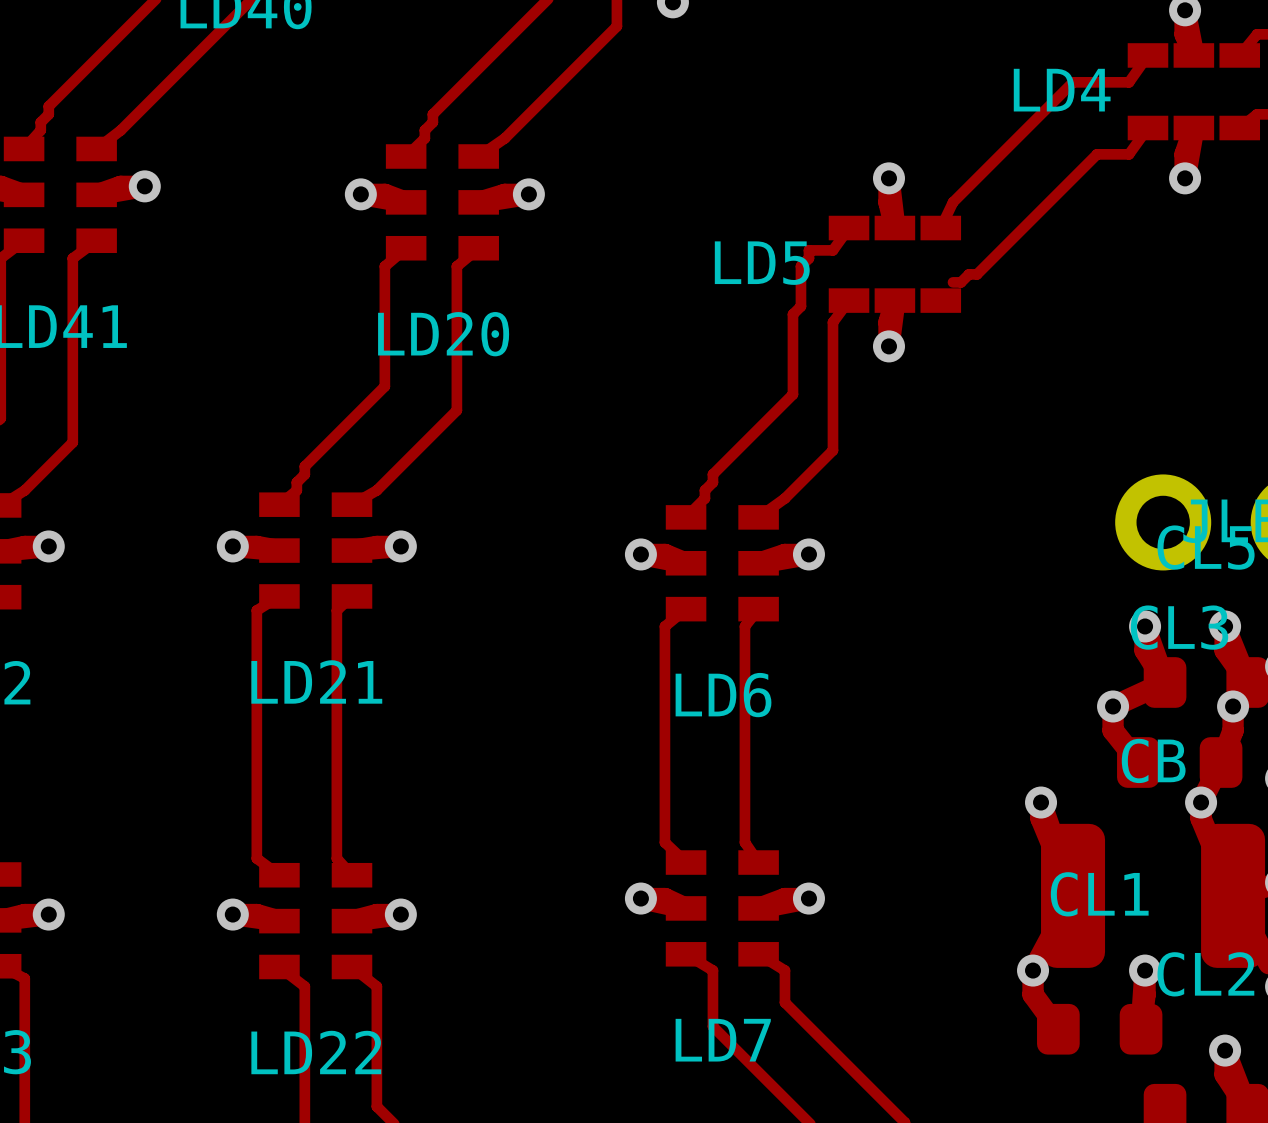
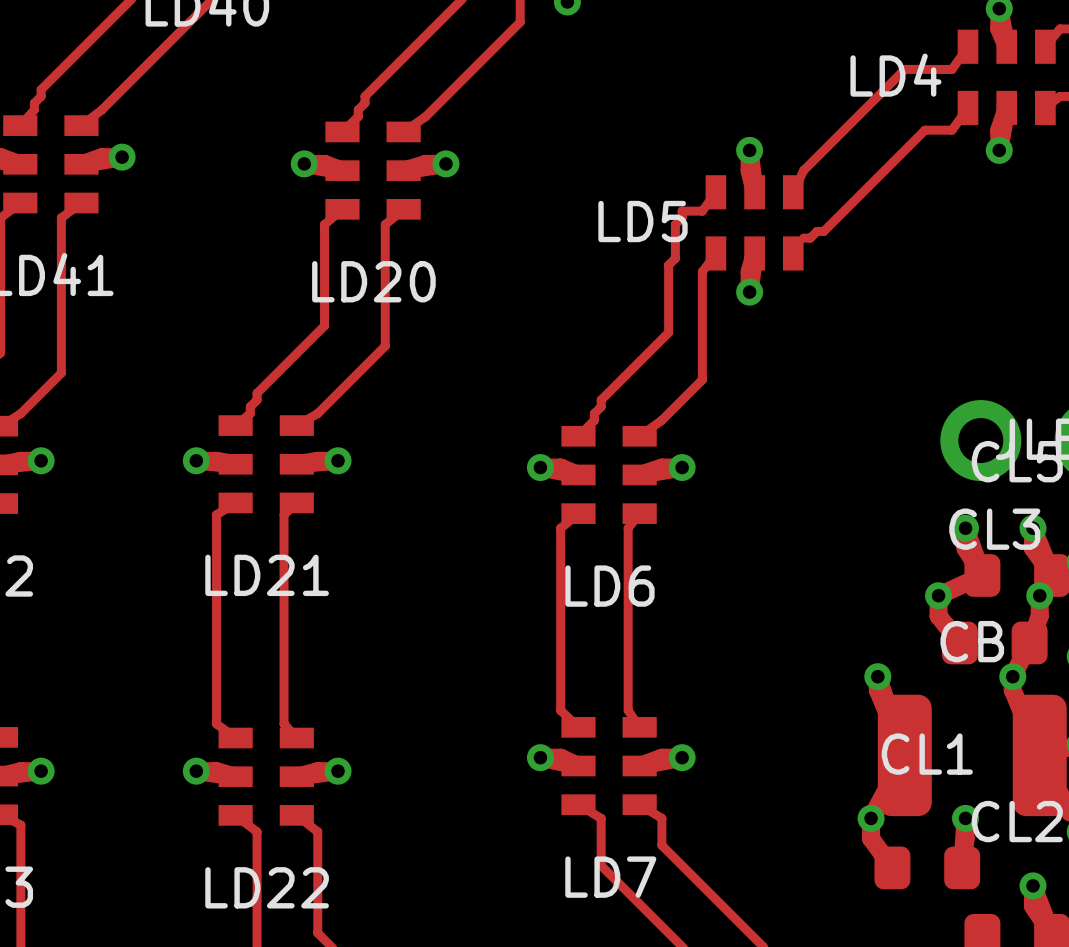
LD4 footprint: [1127, 43, 1261, 141] -> [957, 29, 1056, 126]
LD5 footprint: [828, 215, 962, 313] -> [705, 175, 804, 271]

